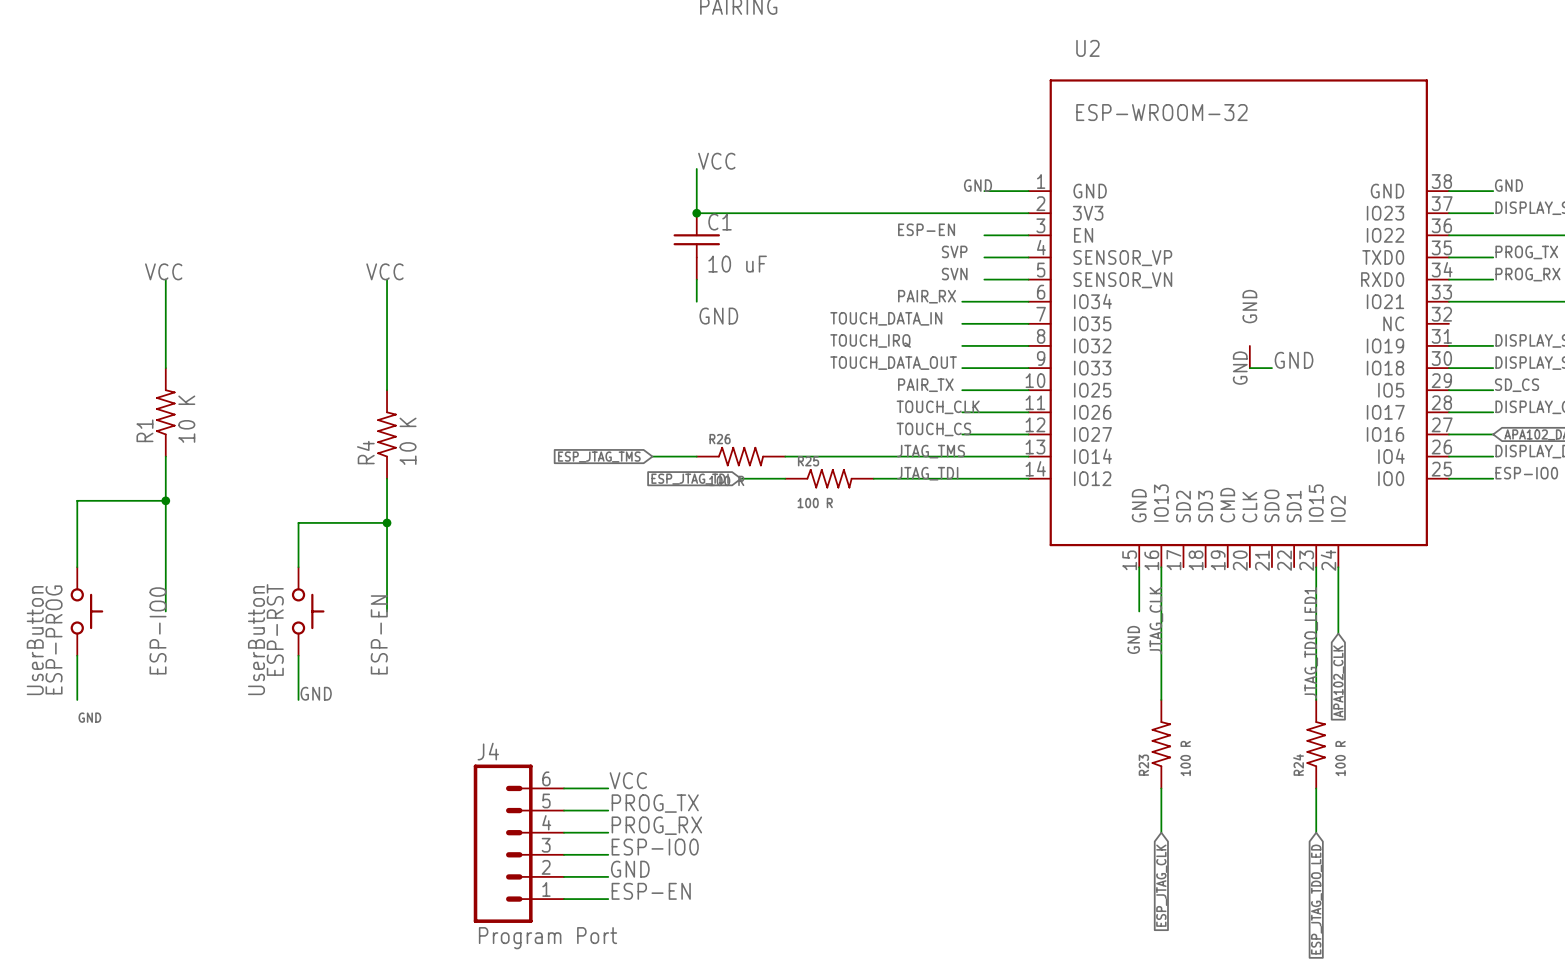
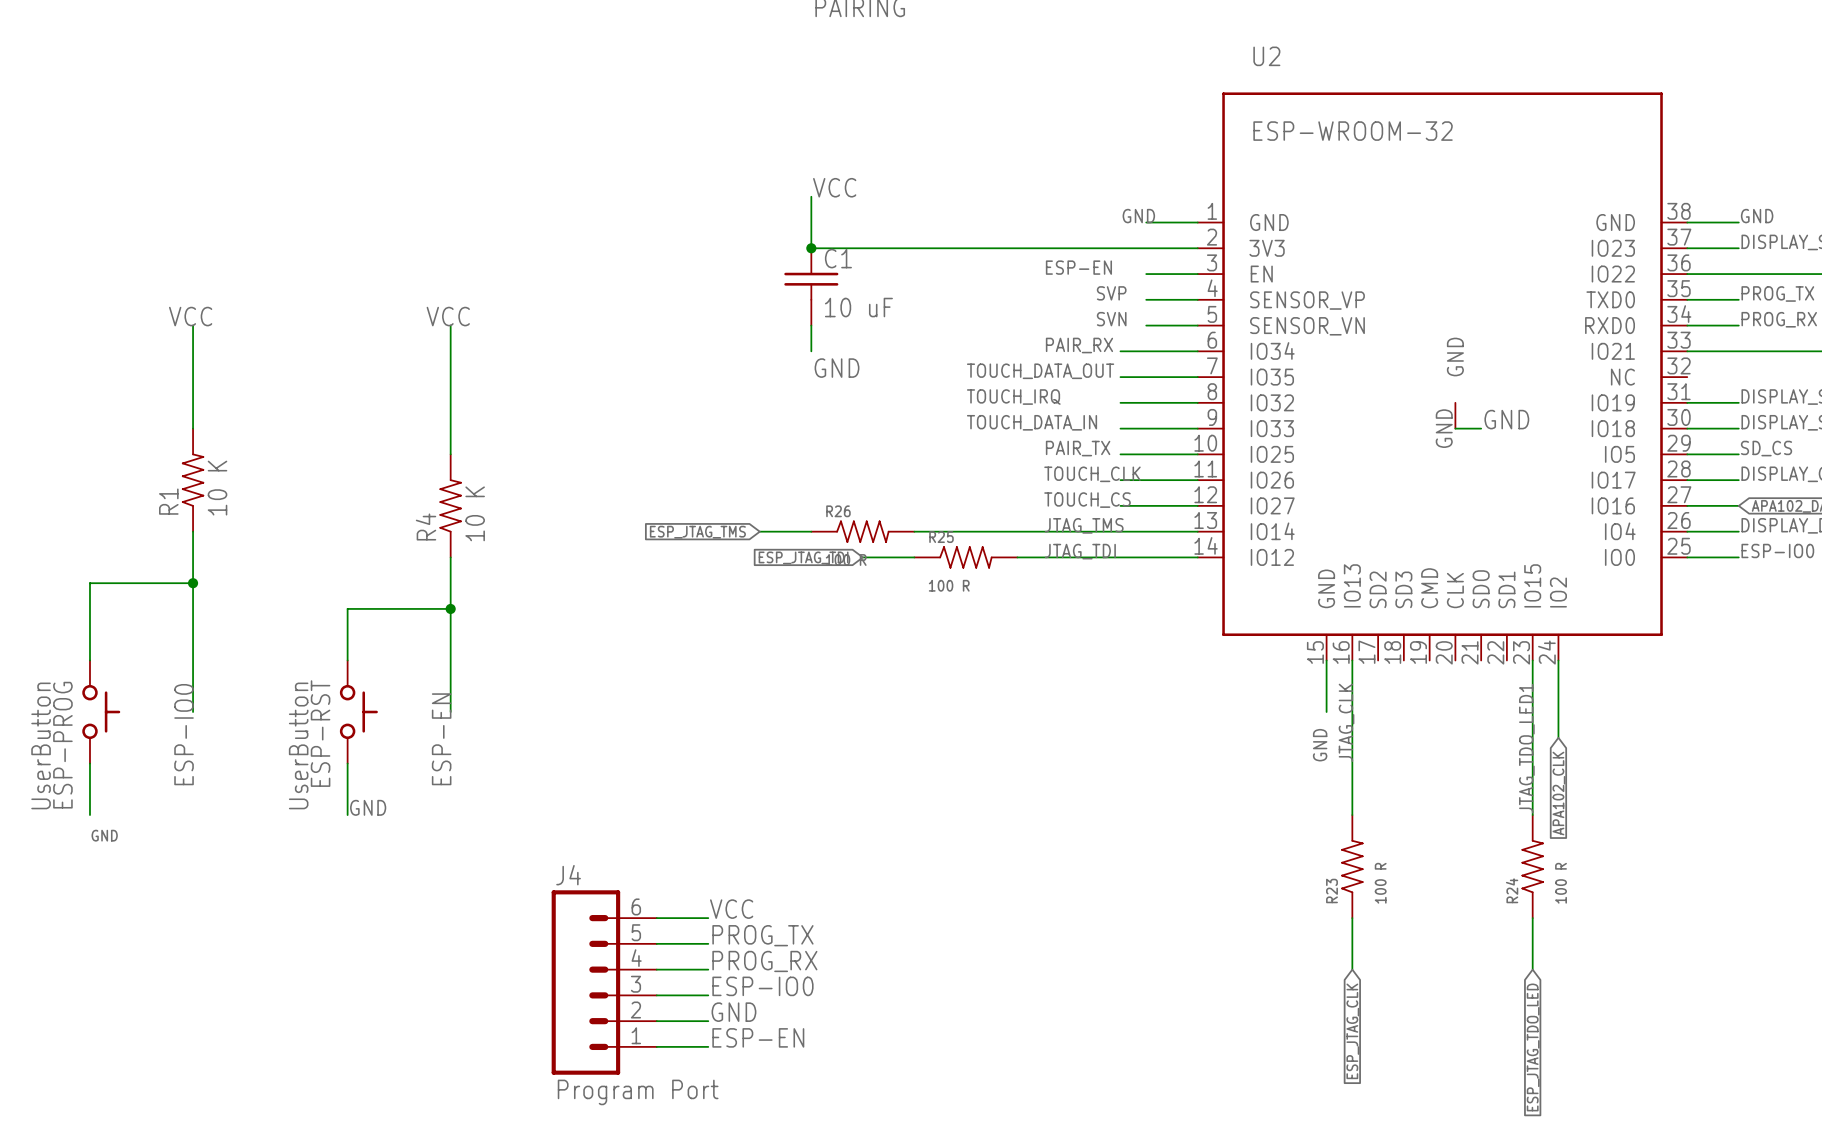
label: TOUCH_DATA_IN (886, 318) -> TOUCH_DATA_OUT (1040, 371)
label: TOUCH_DATA_OUT (893, 363) -> TOUCH_DATA_IN (1032, 422)

